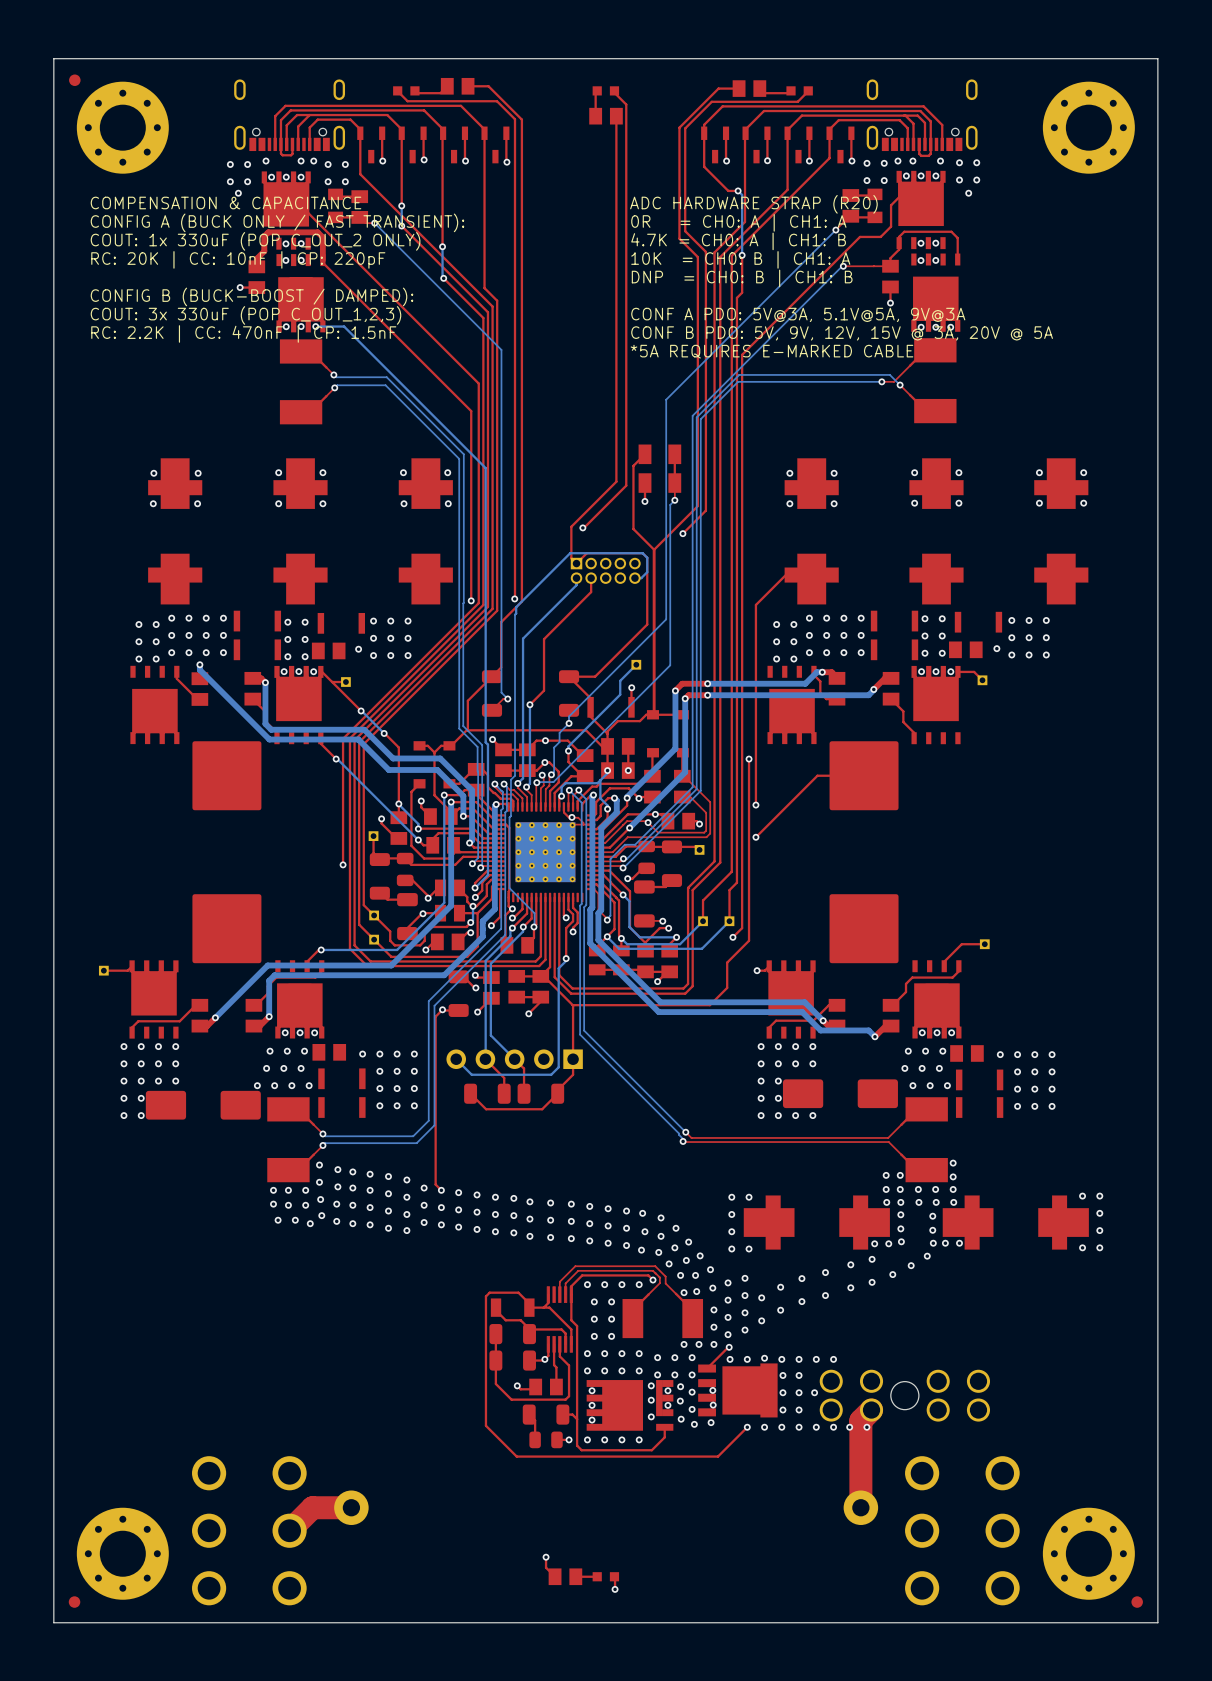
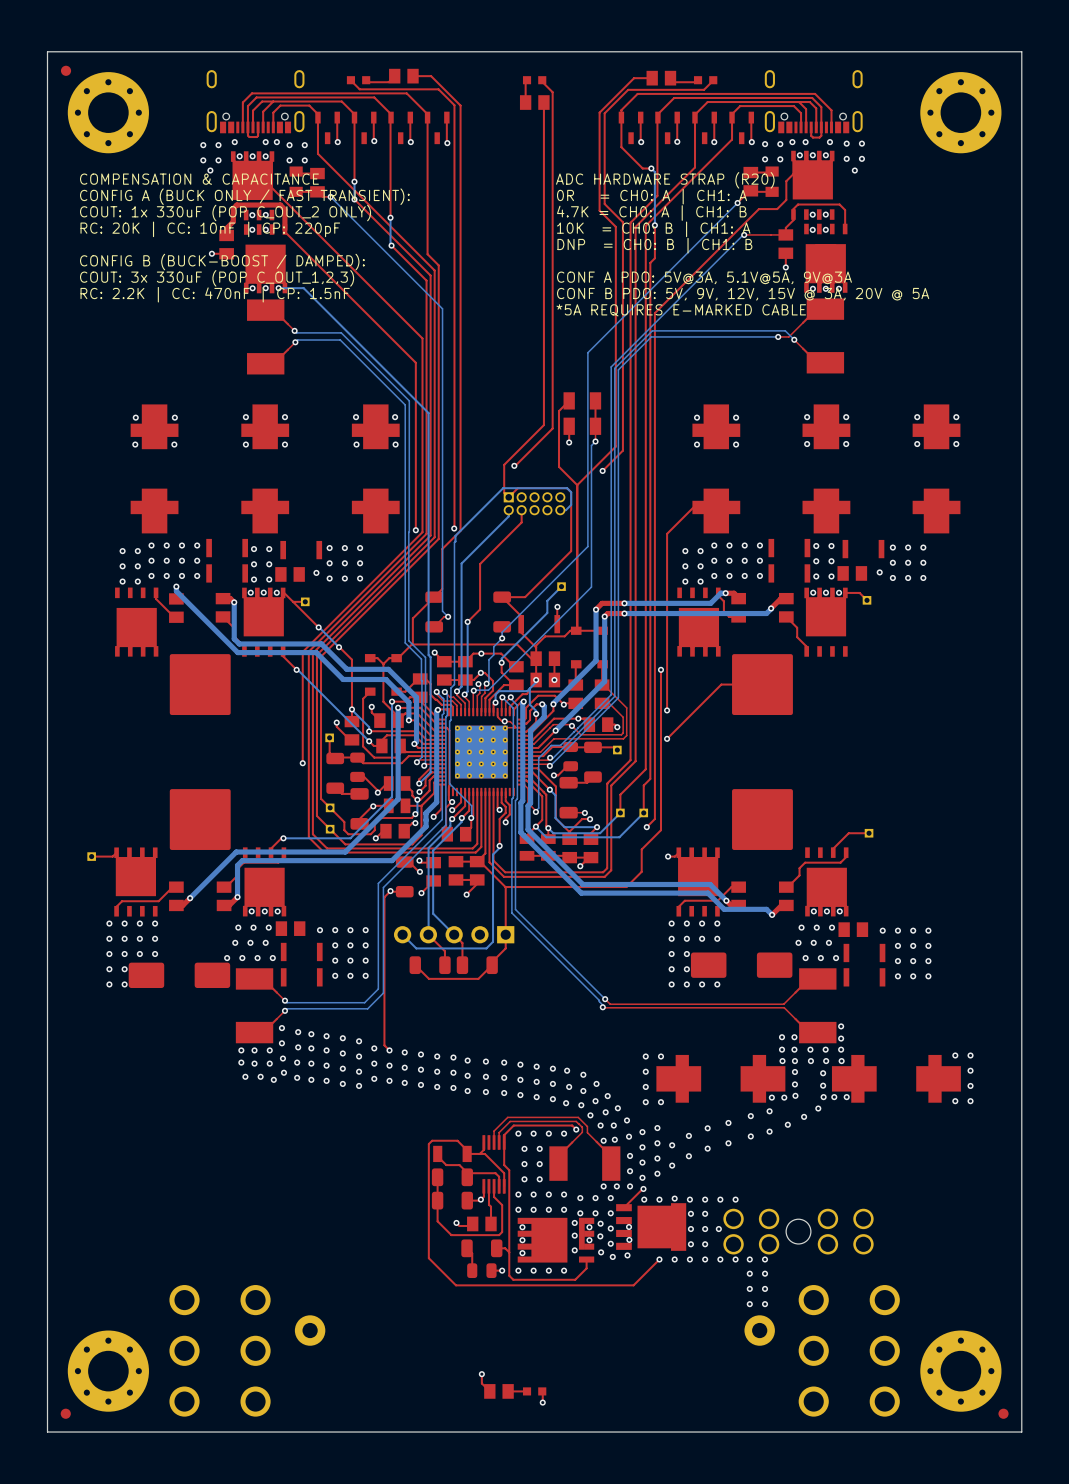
top track: (871, 1410) (860, 1420) (860, 1507) -> none
via: none -> (749, 1273)
via: none -> (765, 1273)
via: none -> (749, 1288)
via: none -> (765, 1288)
via: none -> (749, 1304)
via: none -> (765, 1304)
top track: (351, 1507) (312, 1507) (289, 1530) -> none

